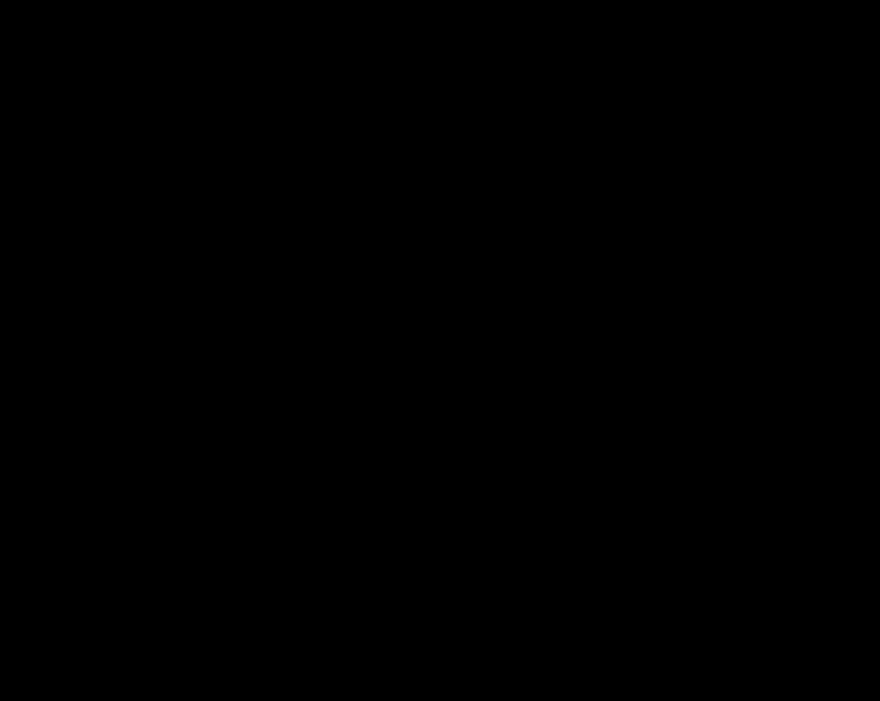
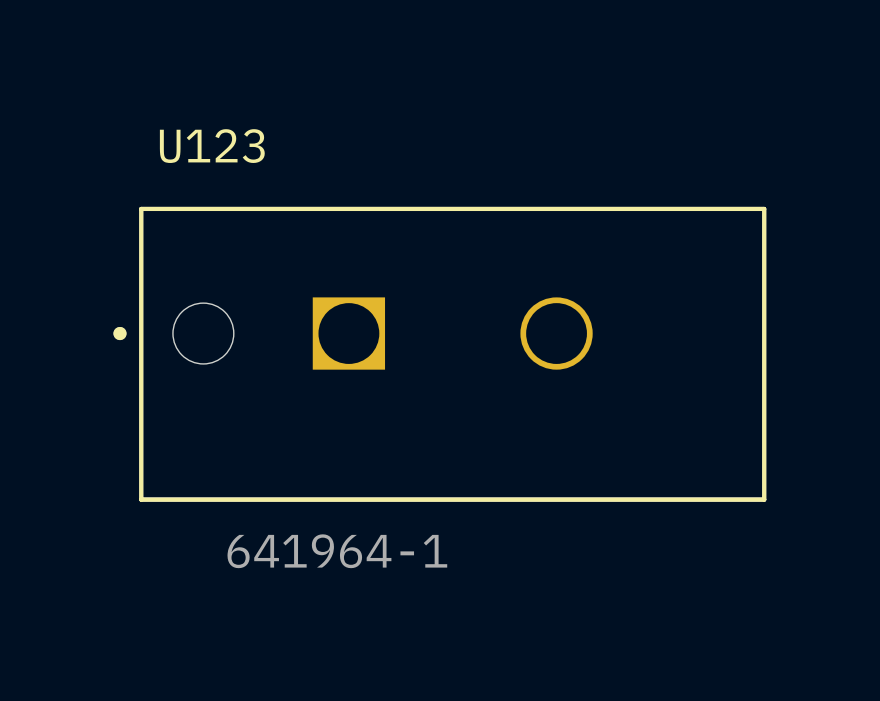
U123: none -> 641964-1 (439, 354)

